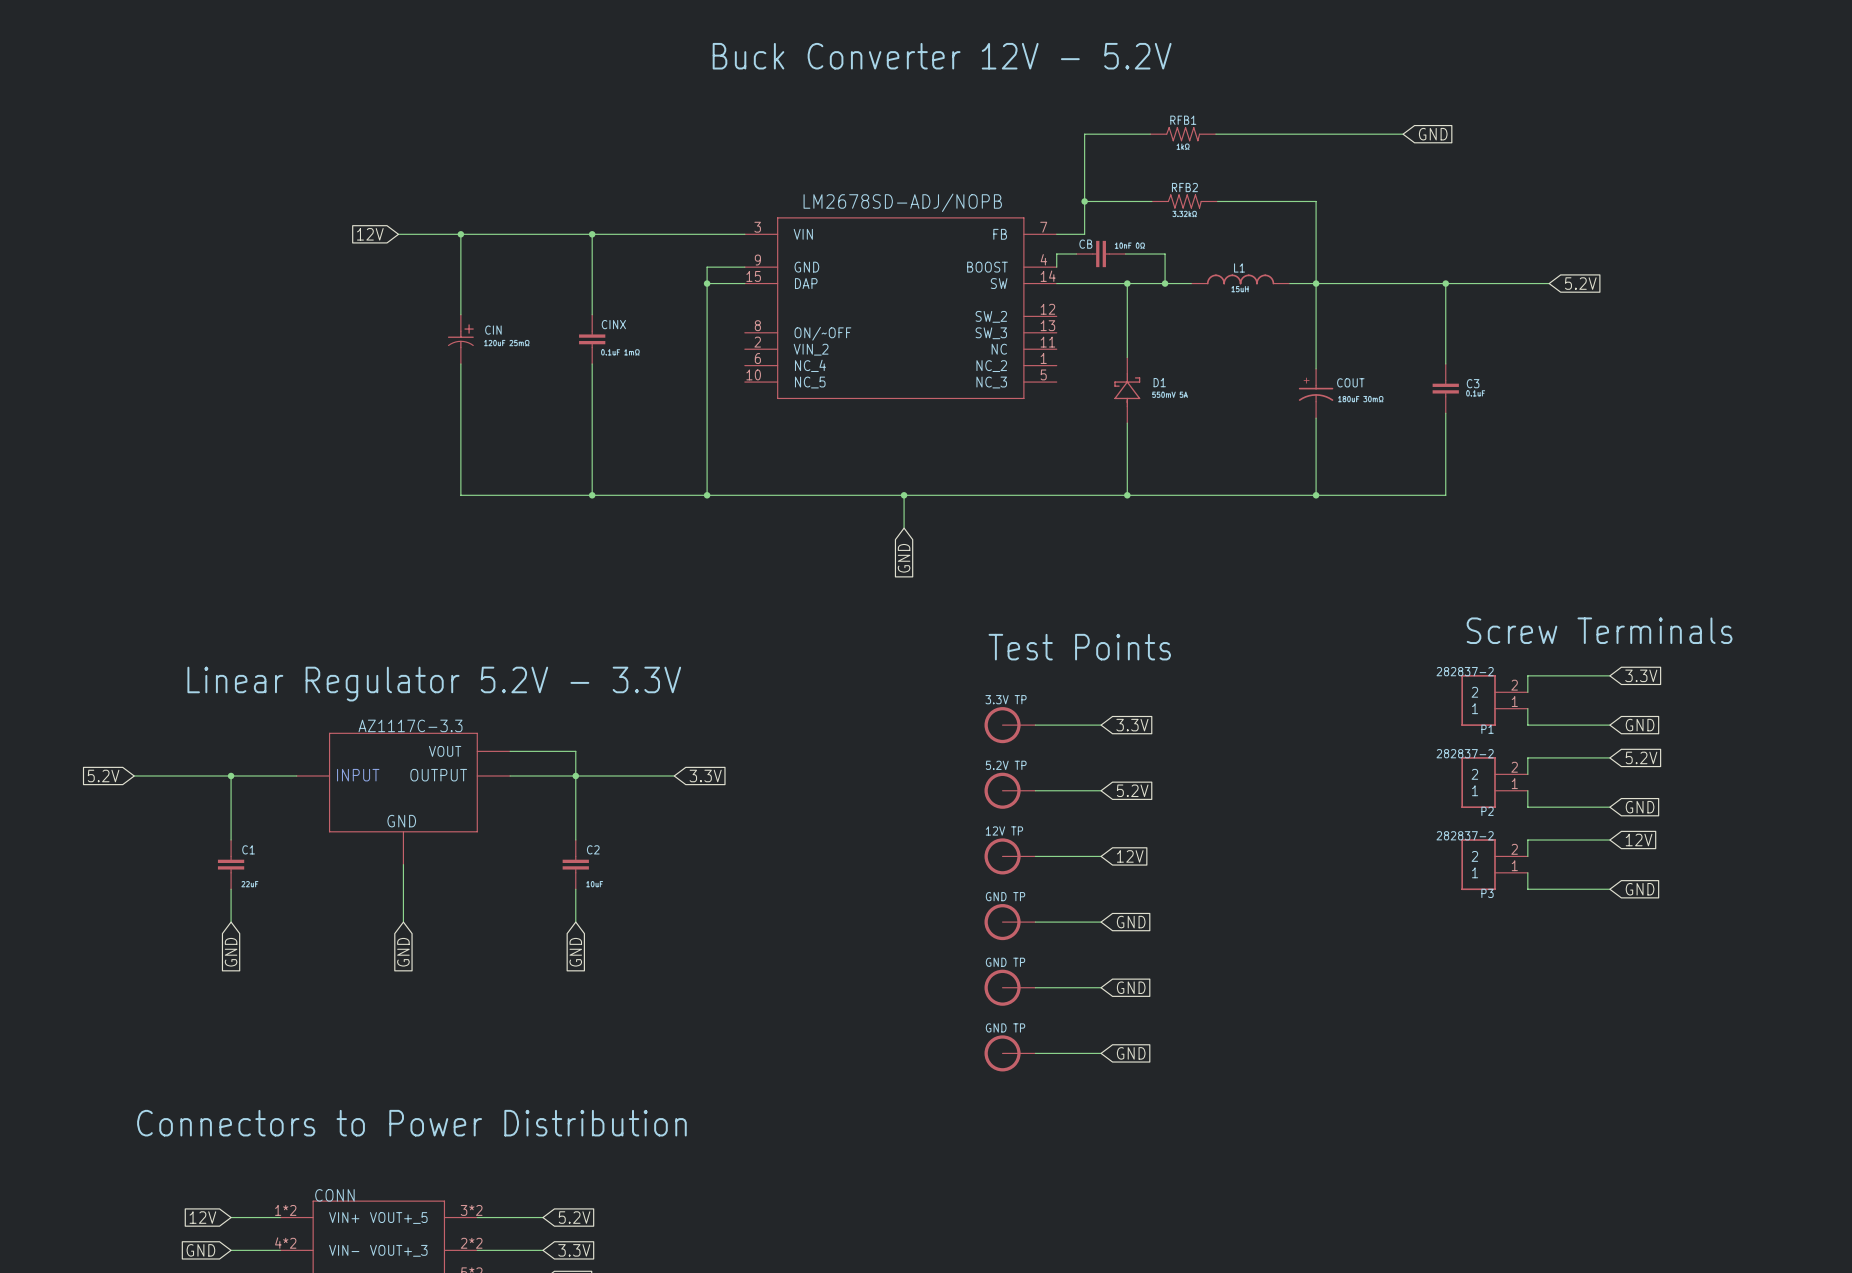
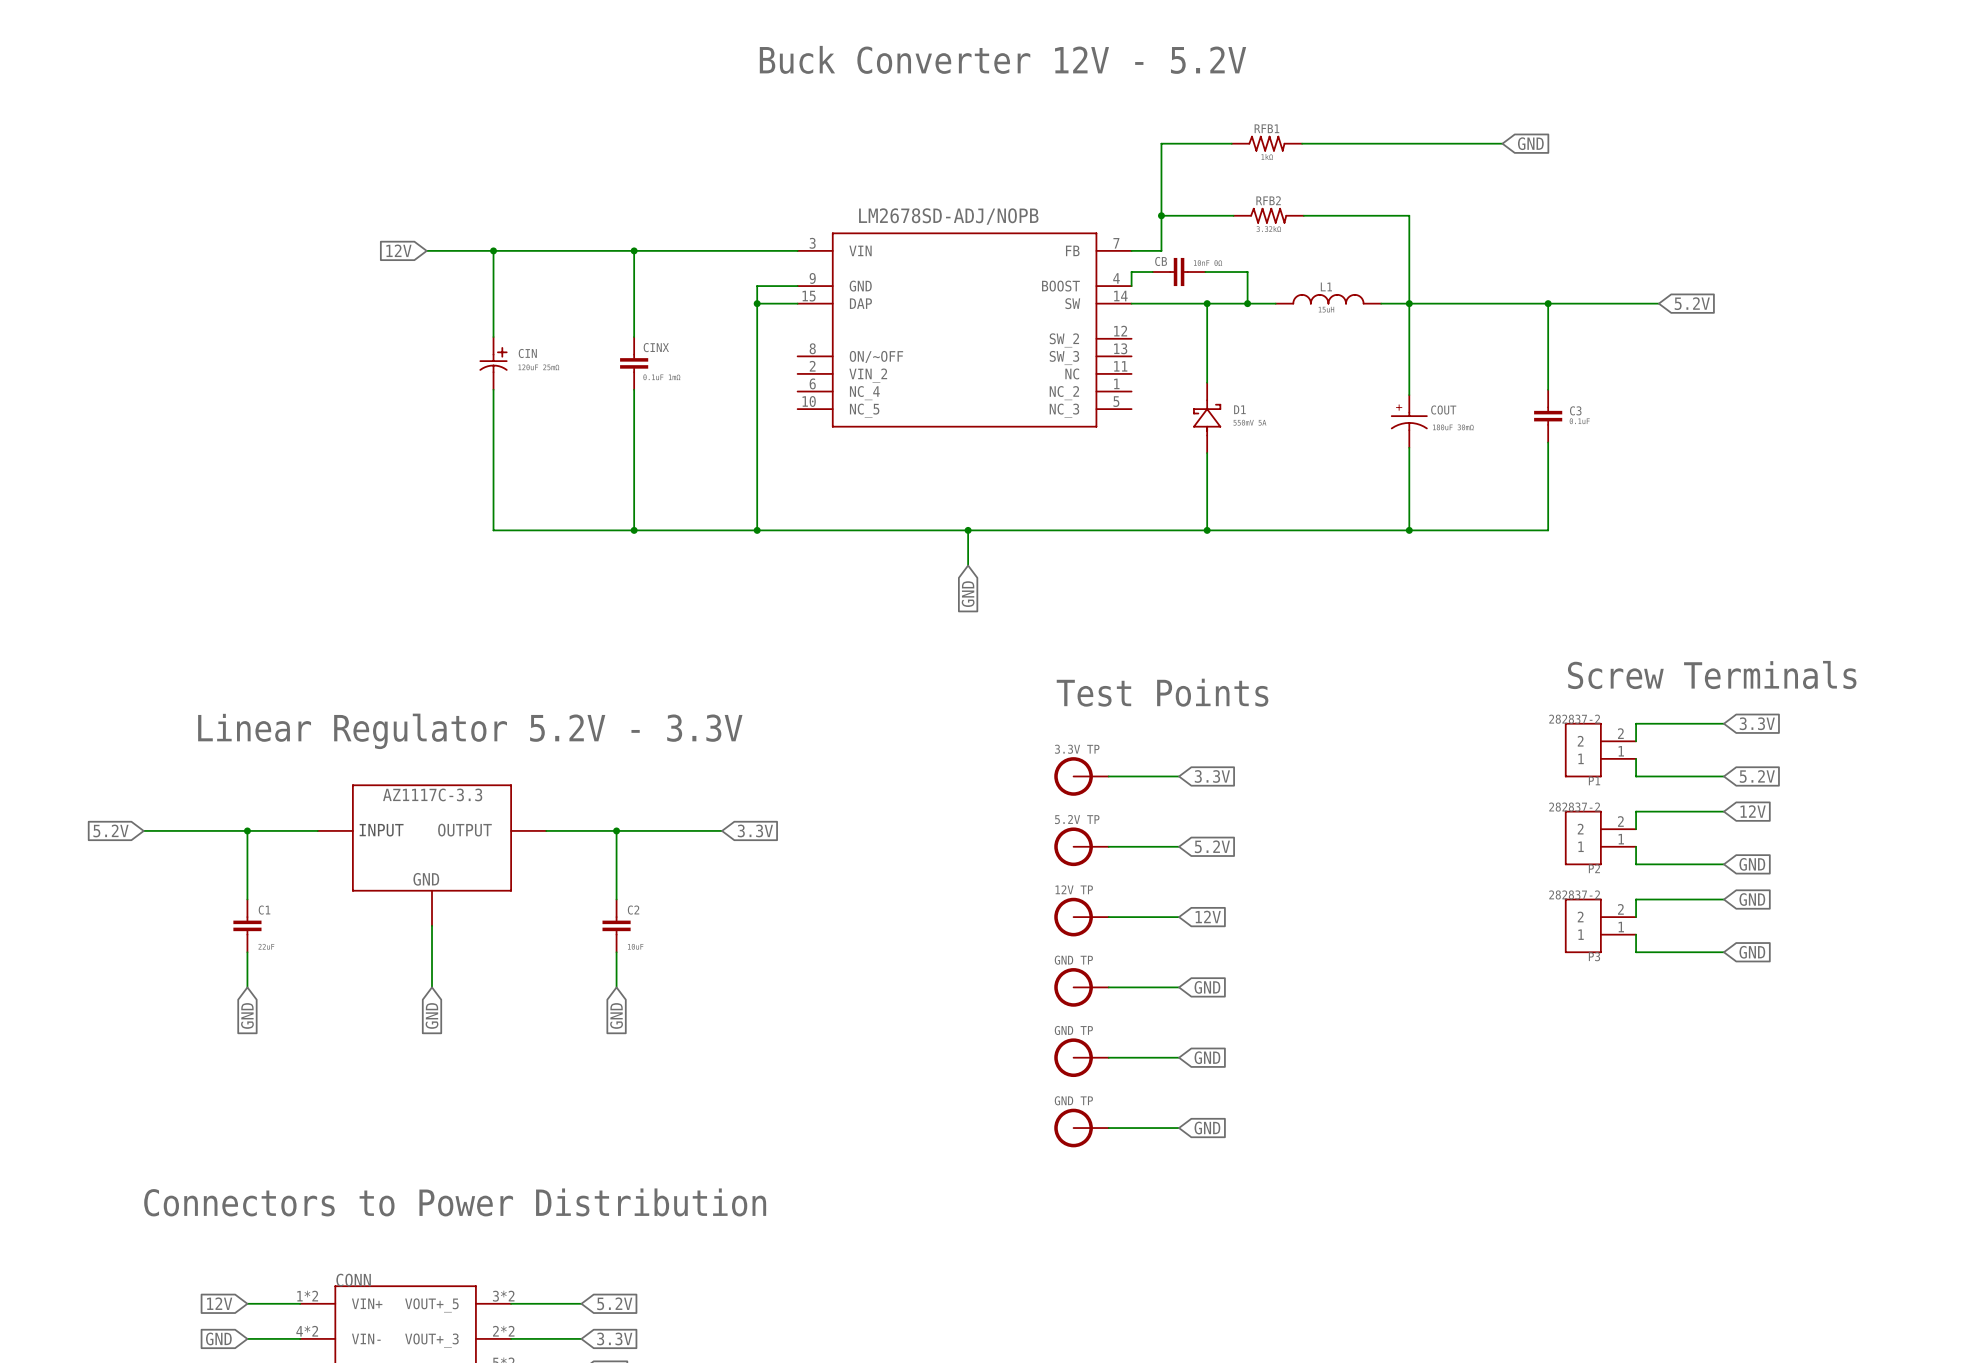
global label: GND (1640, 725) -> 5.2V (1757, 776)
part symbol: [296, 732, 511, 865] -> [317, 784, 547, 926]
wire: (510, 751) (575, 751) (575, 775) -> none
global label: 5.2V (1641, 757) -> 12V (1753, 811)
global label: 12V (1639, 840) -> GND (1752, 899)

